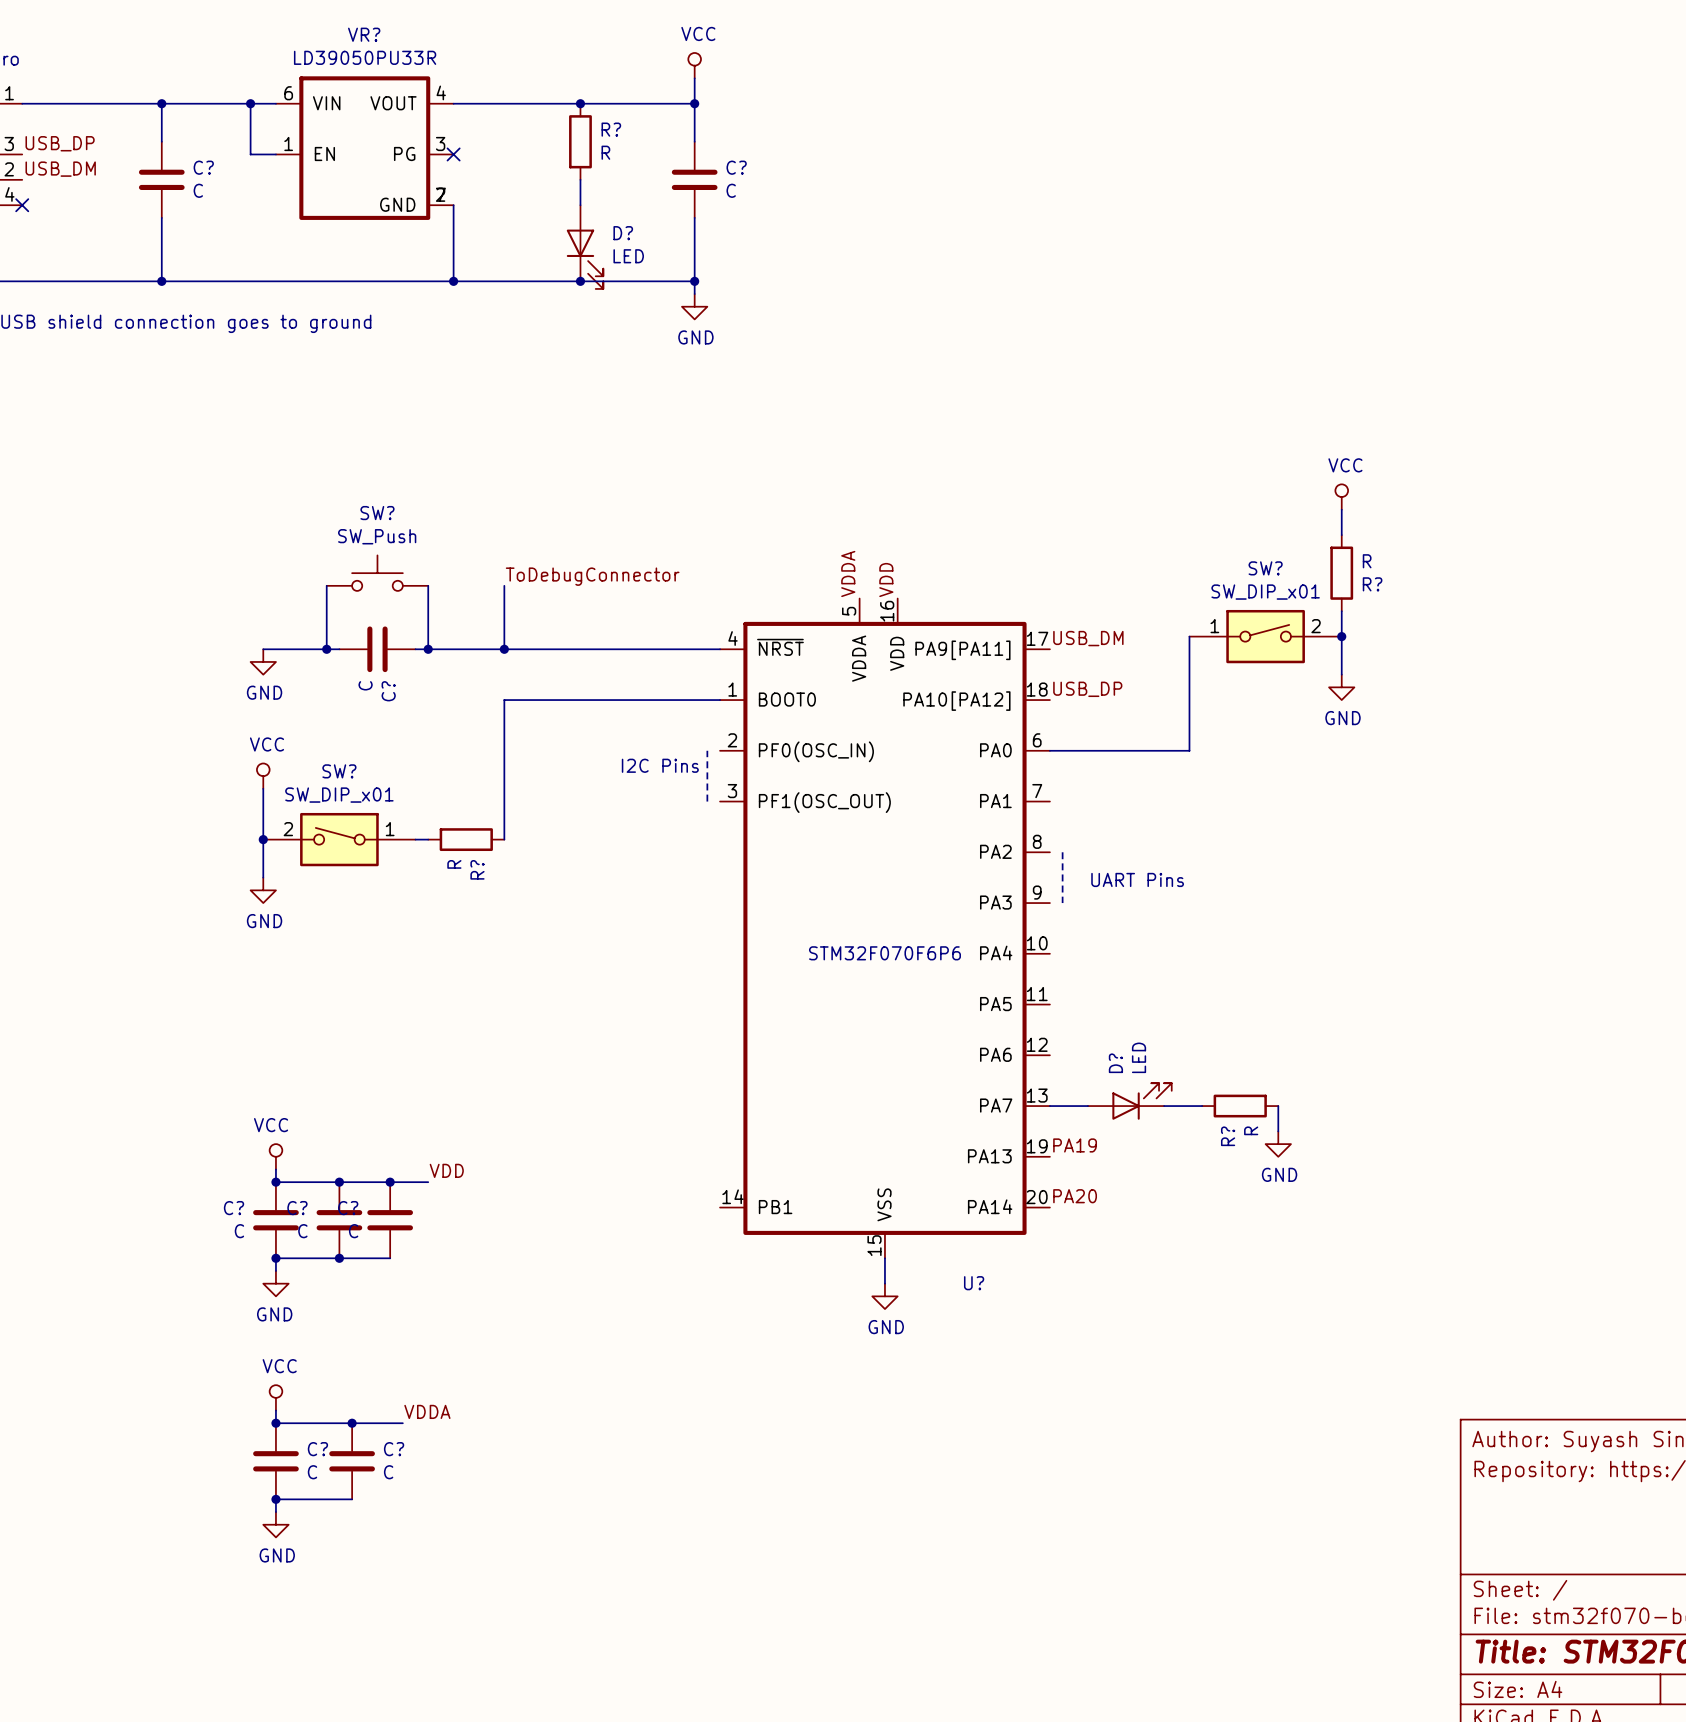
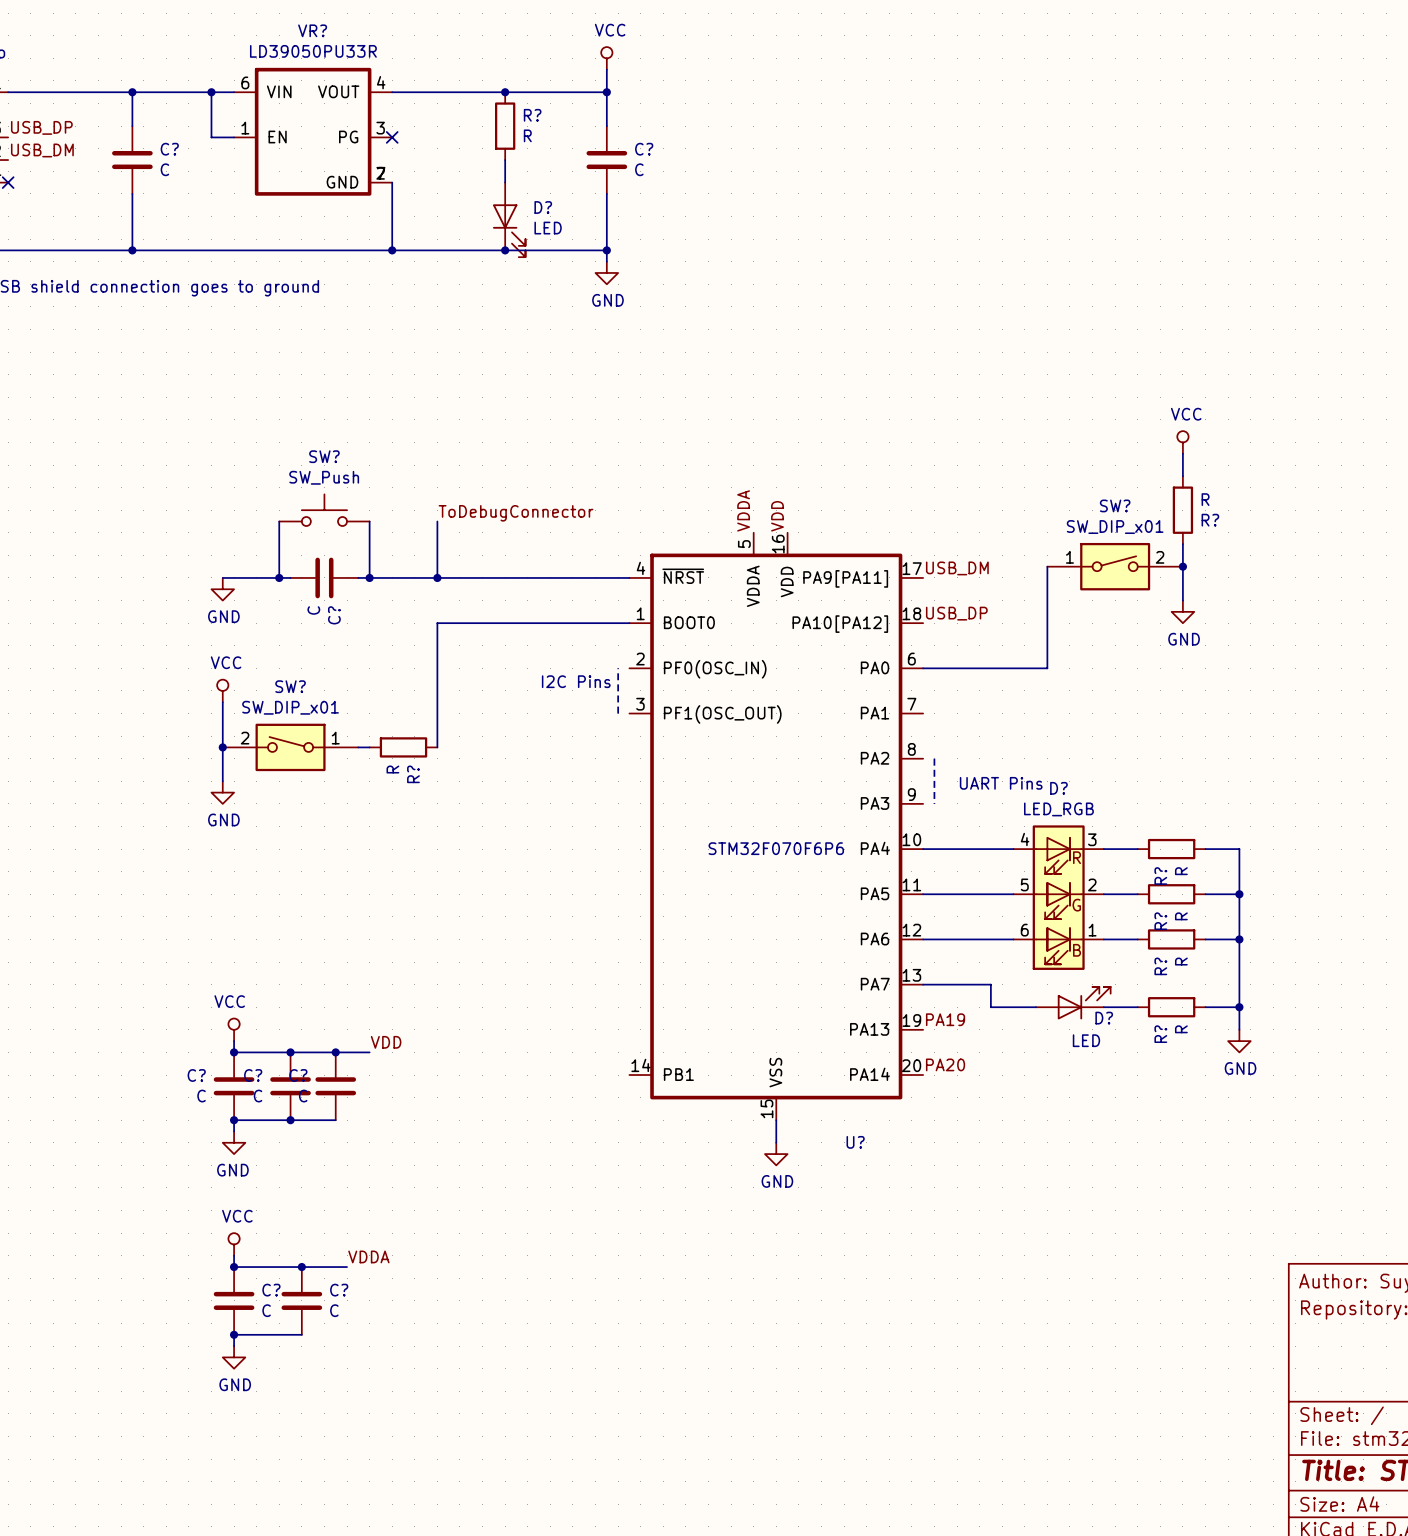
wire: none -> (923, 849) (1013, 849)
wire: none -> (1103, 849) (1137, 849)
R?: none -> R (1171, 849)
wire: none -> (1205, 849) (1239, 849) (1239, 1029)
wire: none -> (923, 894) (1013, 894)
wire: none -> (1103, 894) (1137, 894)
R?: none -> R (1171, 894)
wire: none -> (1205, 894) (1239, 894)
junction: none -> (1239, 894)
D?: none -> LED_RGB (1058, 897)
wire: none -> (923, 939) (1013, 939)
wire: none -> (1103, 939) (1137, 939)
R?: none -> R (1171, 939)
wire: none -> (1205, 939) (1239, 939)
junction: none -> (1239, 939)
D? value rotation: 0° (1139, 1057) -> 90° clockwise (1086, 1040)
D? value position: LED (1139, 1057) -> LED (1086, 1040)
D? name rotation: 0° (1115, 1063) -> 90° clockwise (1104, 1018)
D? name position: D? (1115, 1063) -> D? (1104, 1018)
D? position: (1129, 1101) -> (1073, 1003)
wire: none -> (957, 984) (990, 984) (990, 1007) (1036, 1007)
wire: (1164, 1106) (1202, 1106) -> (1103, 1007) (1137, 1007)
R?: R (1240, 1106) -> none
wire: (1278, 1106) (1278, 1131) -> none
R?: none -> R (1171, 1007)
wire: none -> (1205, 1007) (1239, 1007)
junction: none -> (1239, 1007)
power symbol position: GND (1278, 1144) -> GND (1239, 1041)

